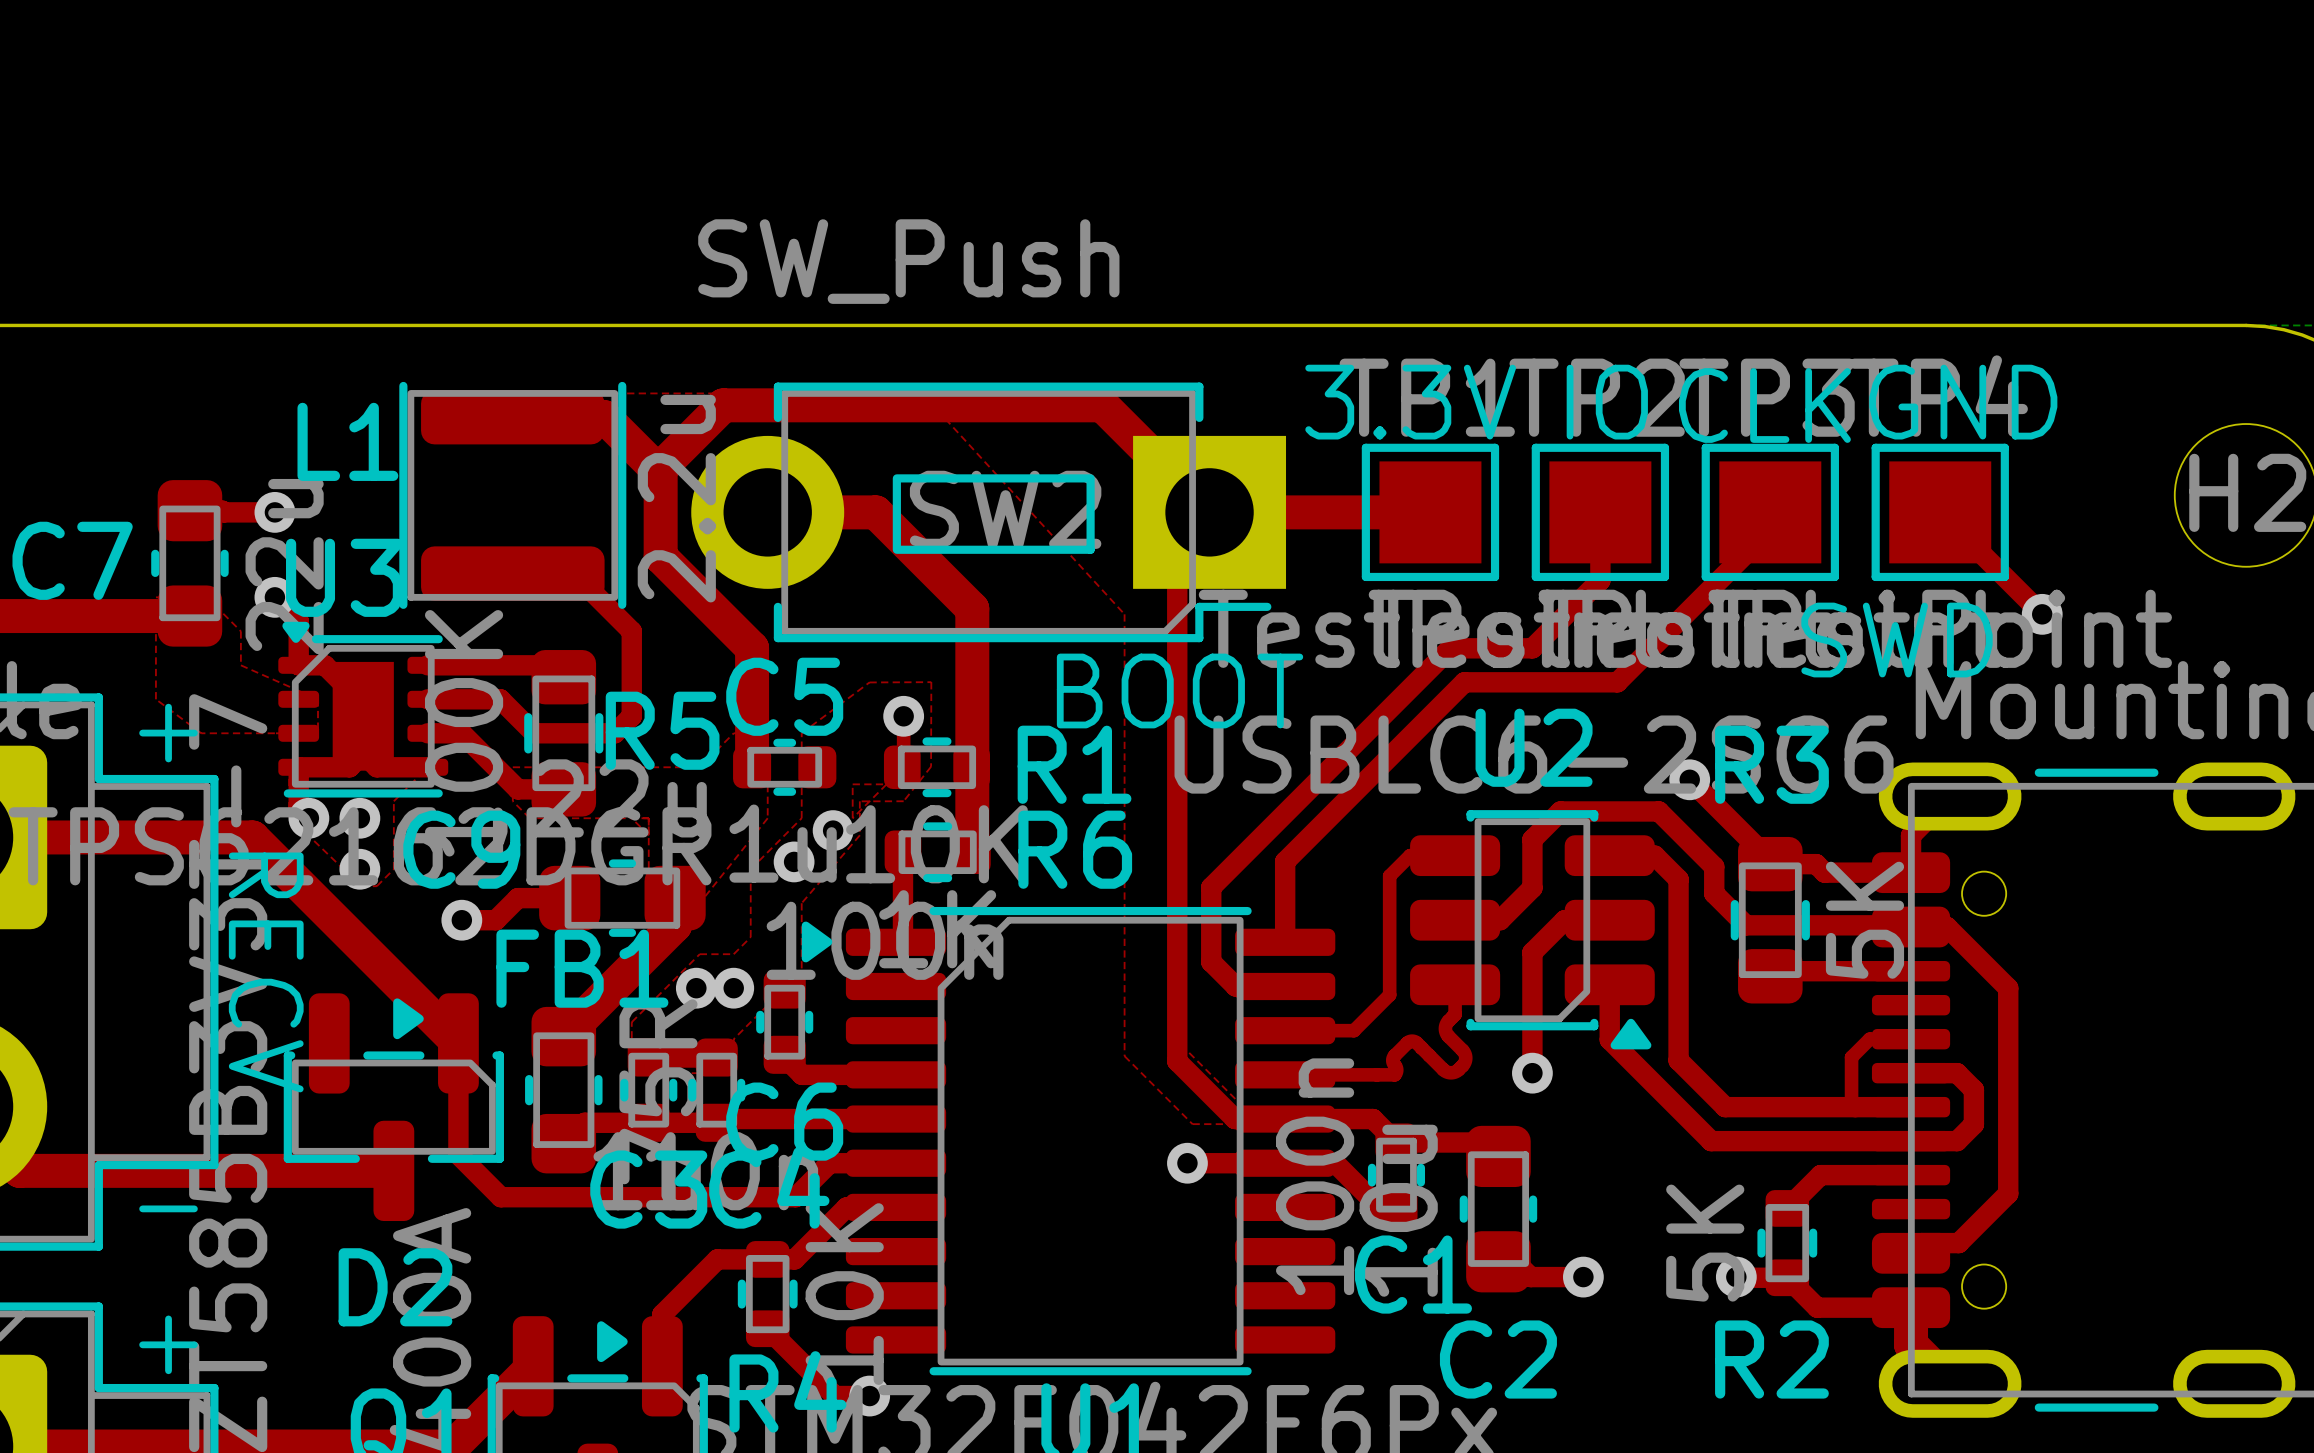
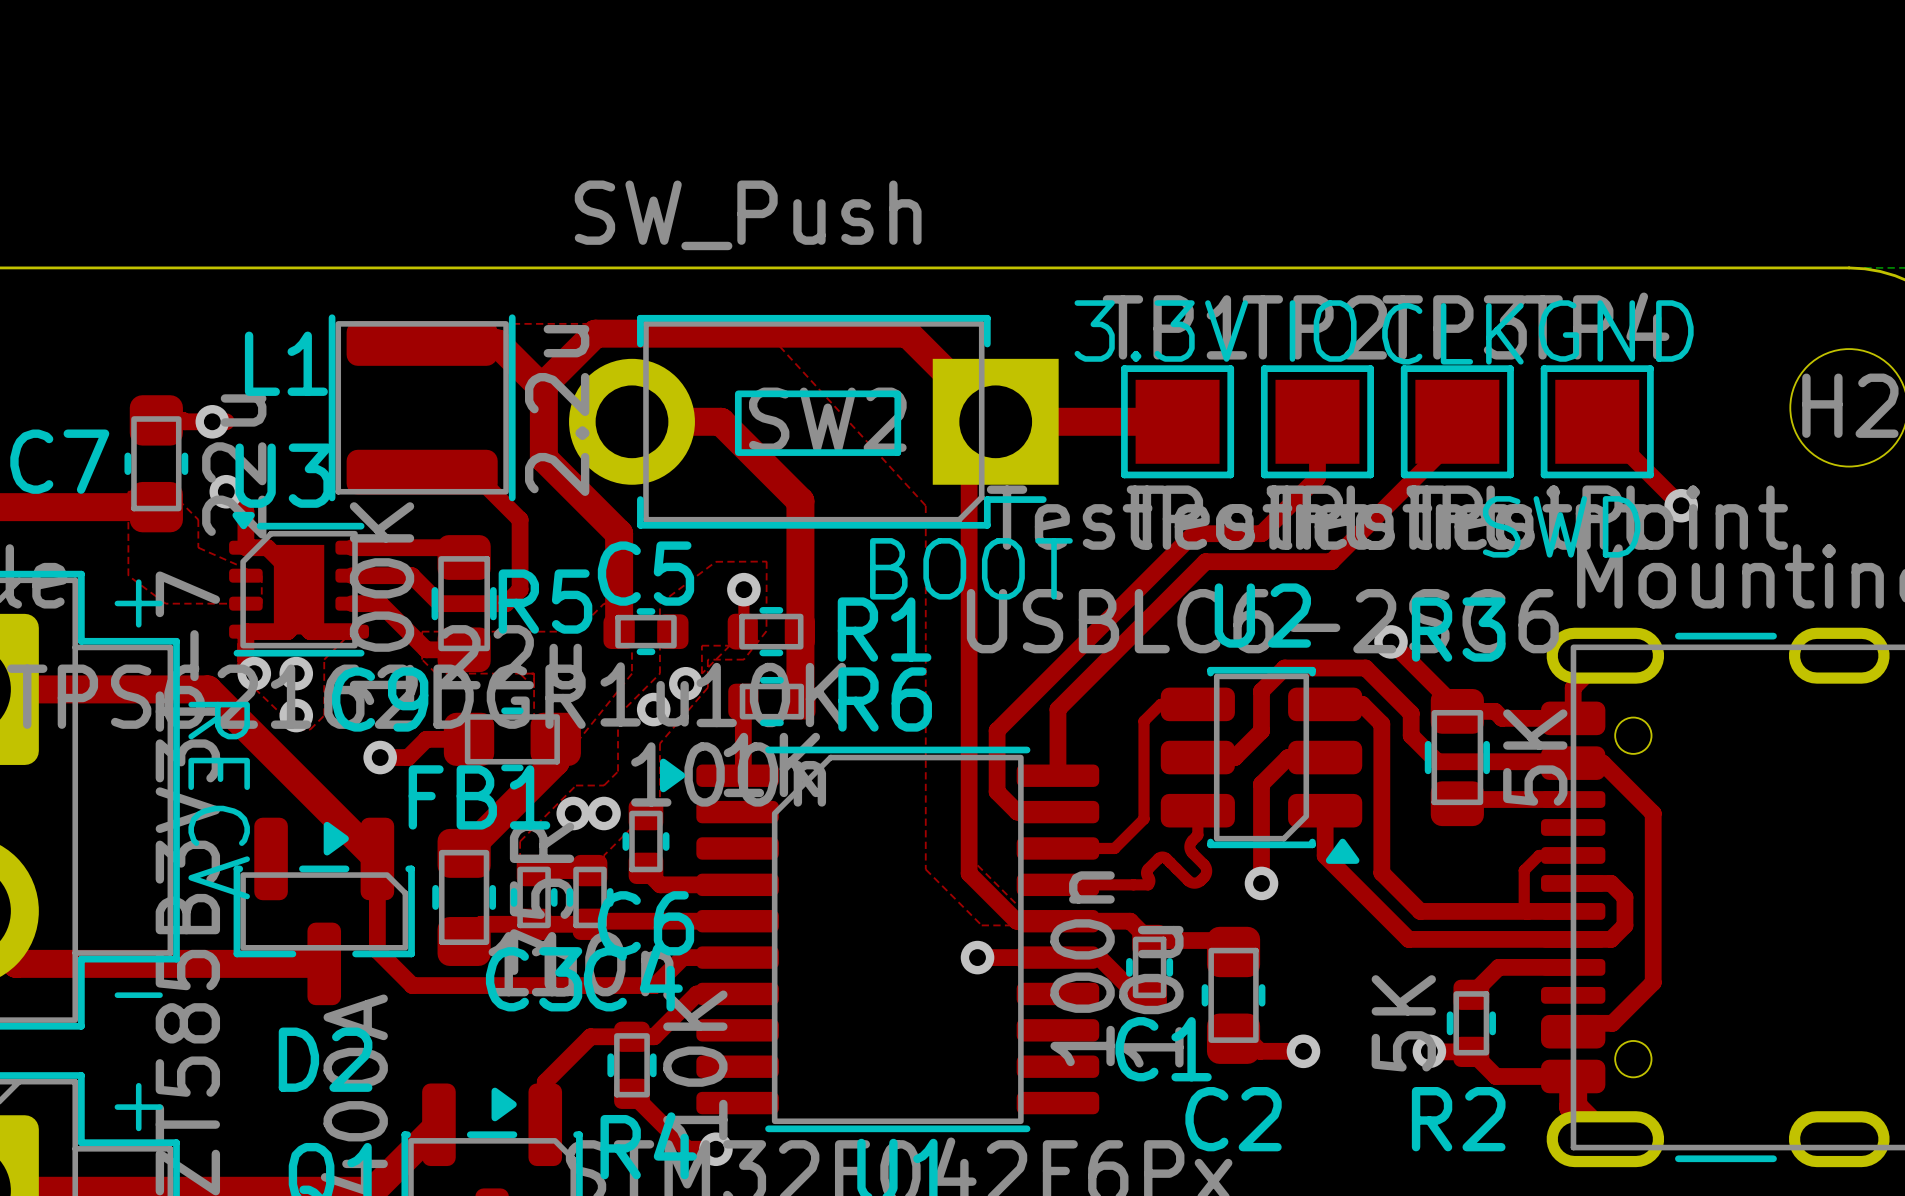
via position: (274, 512) -> (212, 421)

